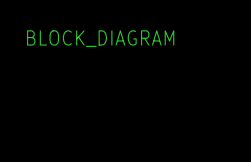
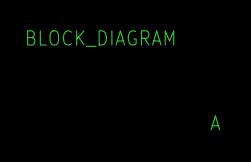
text: none -> A (215, 122)

